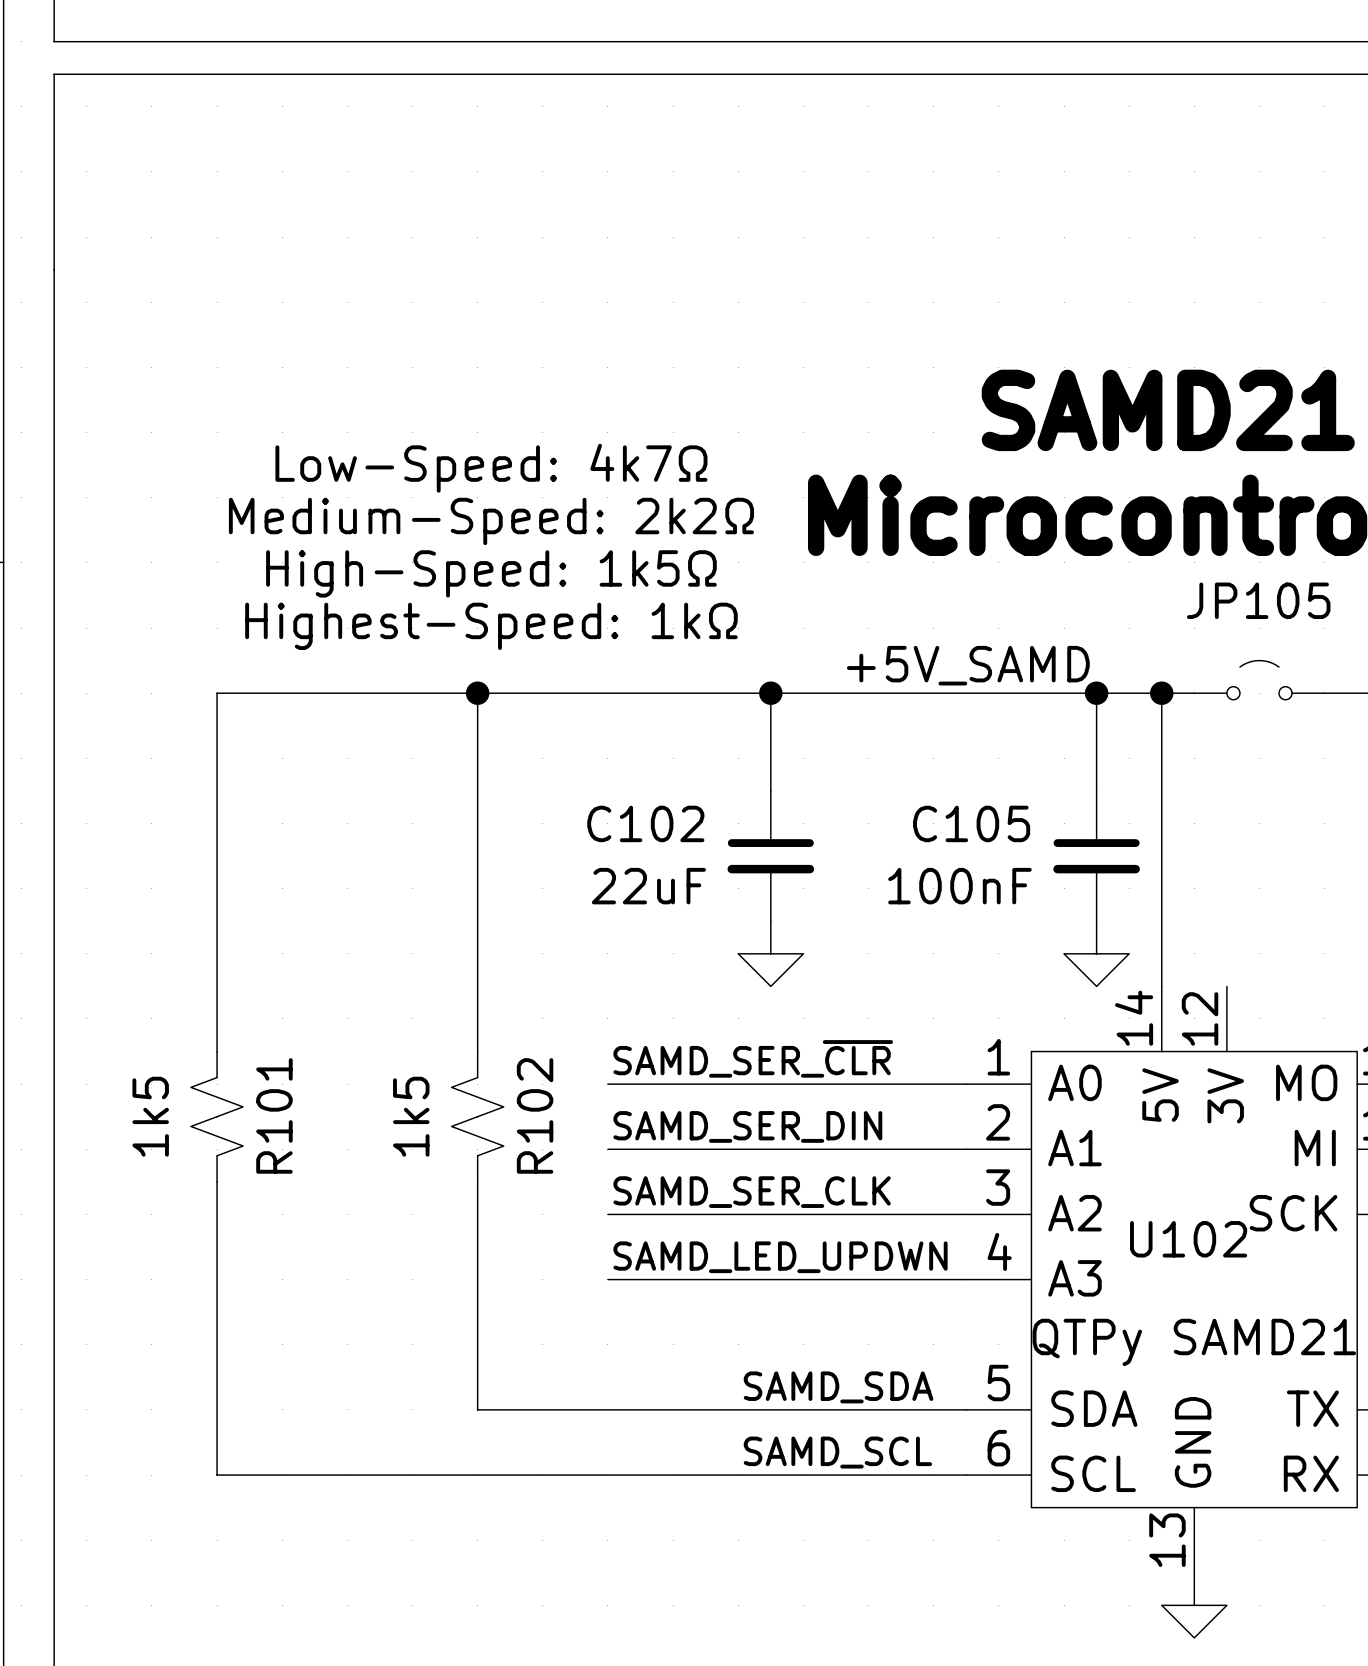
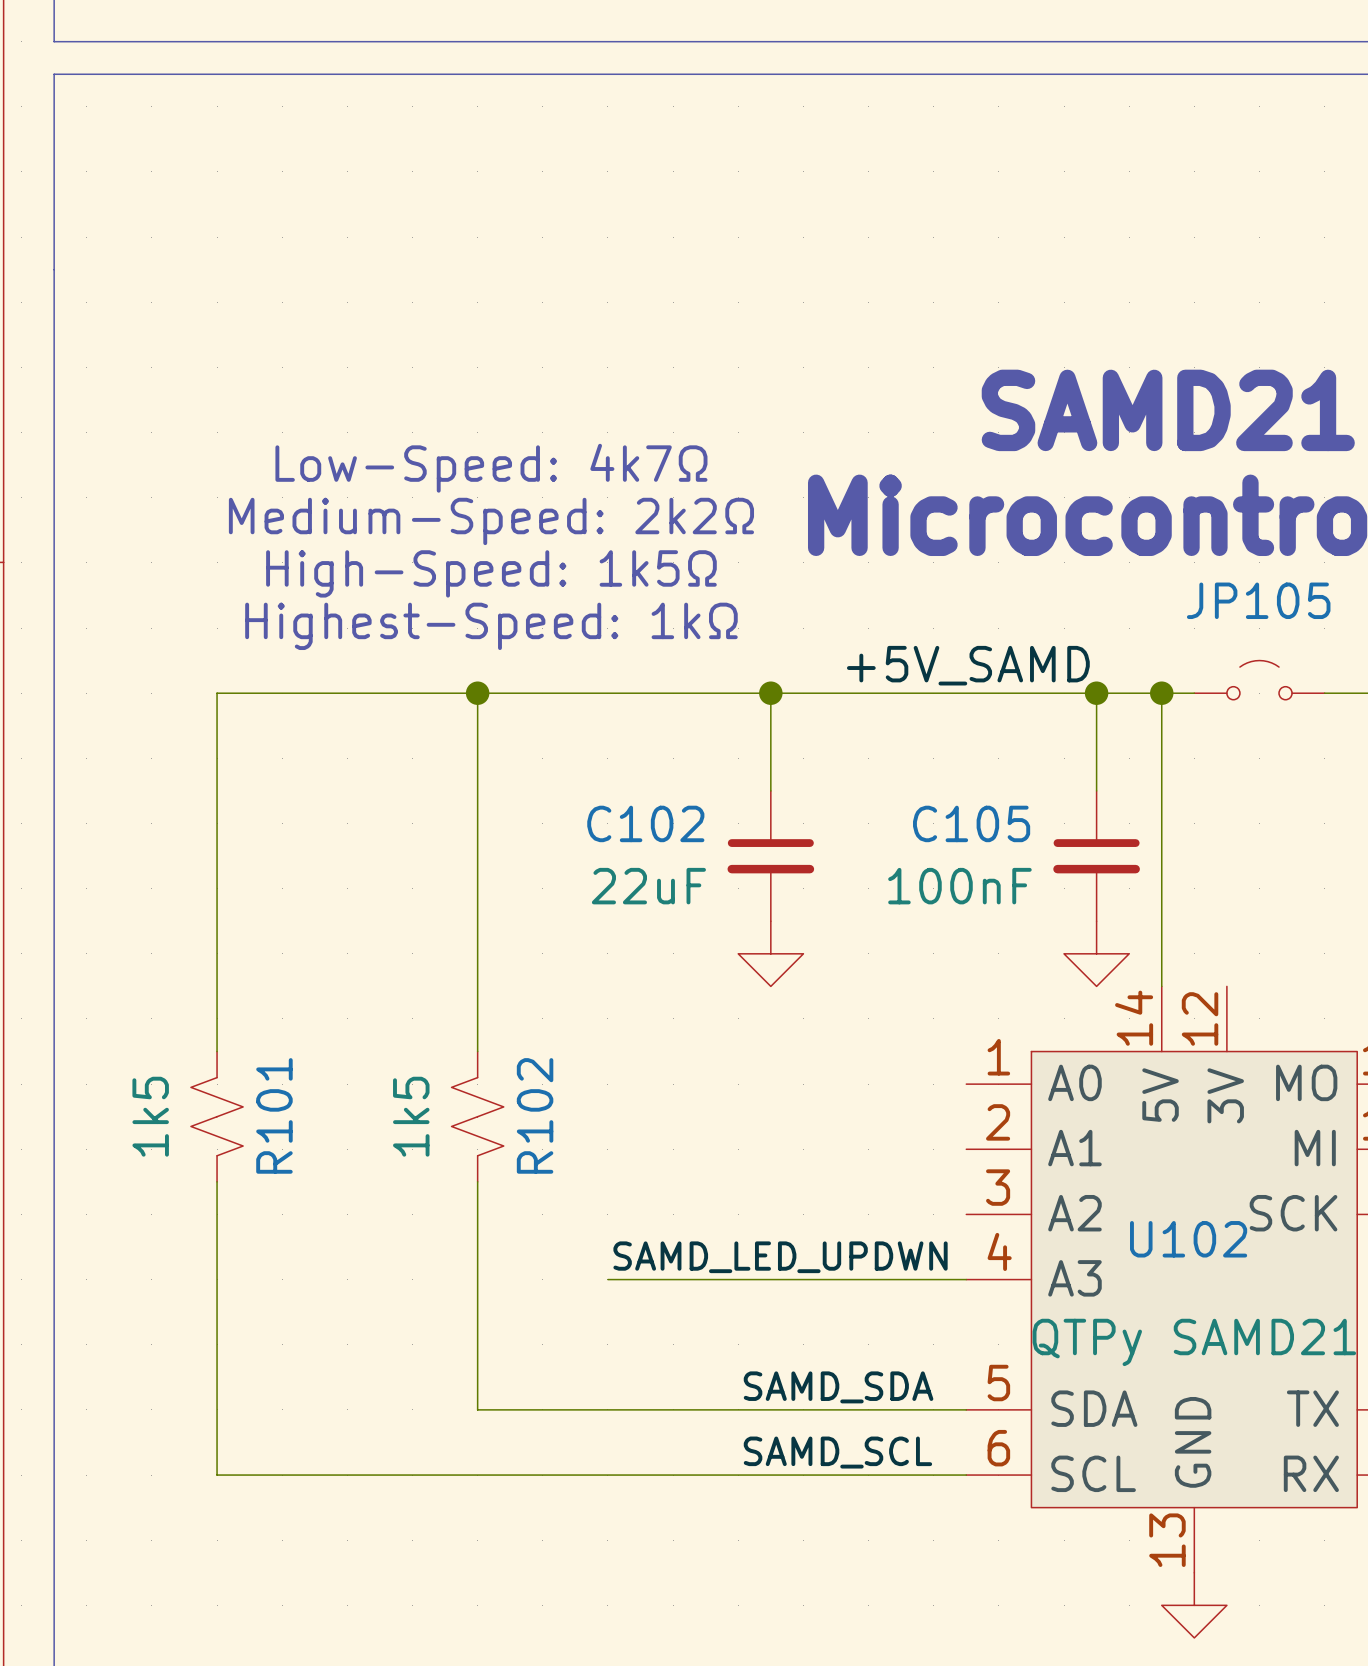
label: SAMD_SER_~{CLR} (753, 1058) -> none
wire: (607, 1084) (966, 1084) -> none
label: SAMD_SER_DIN (747, 1126) -> none
wire: (607, 1149) (966, 1149) -> none
label: SAMD_SER_CLK (752, 1192) -> none
wire: (607, 1214) (966, 1214) -> none

